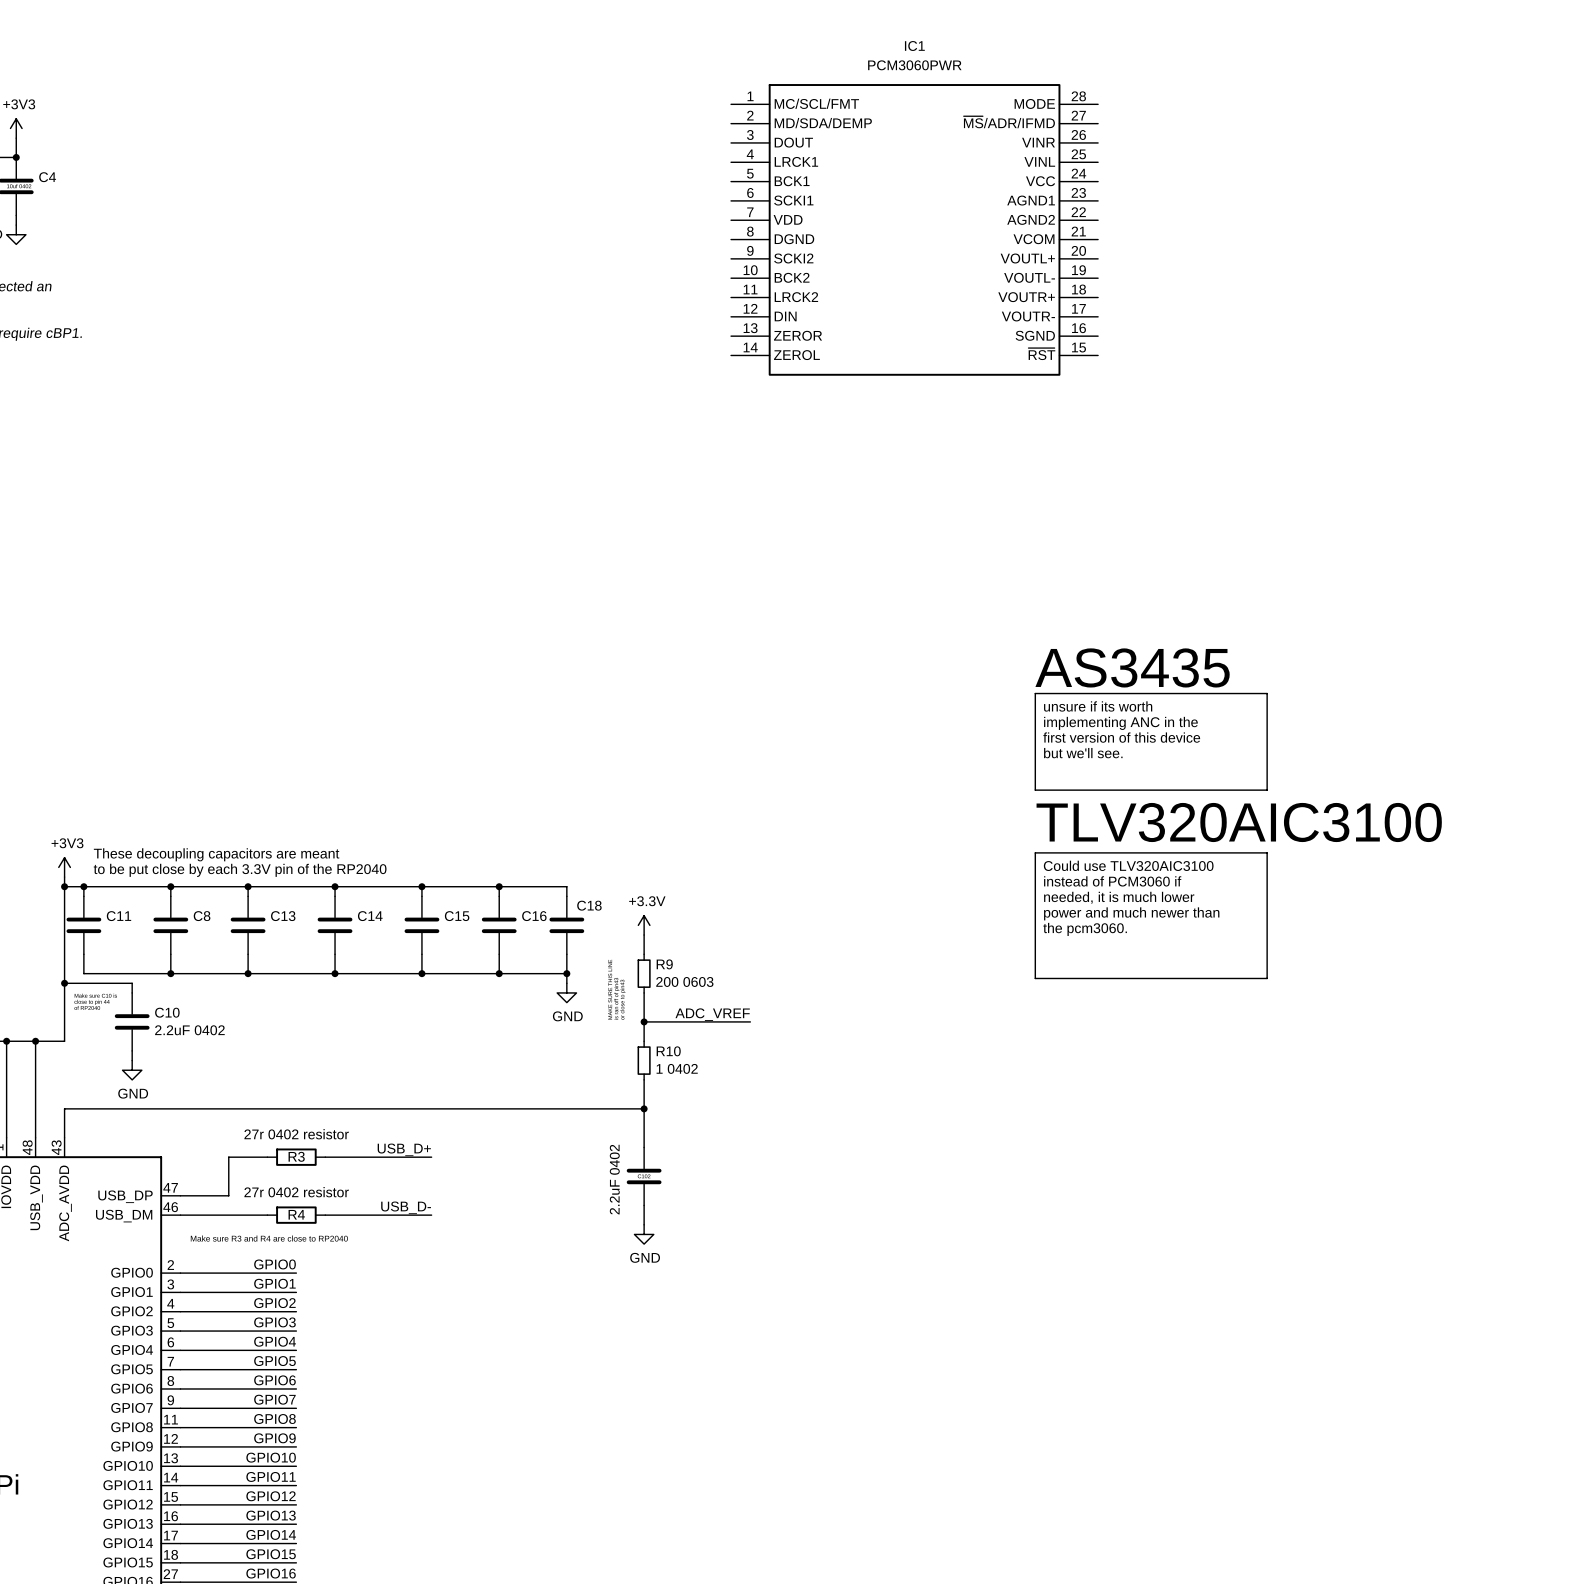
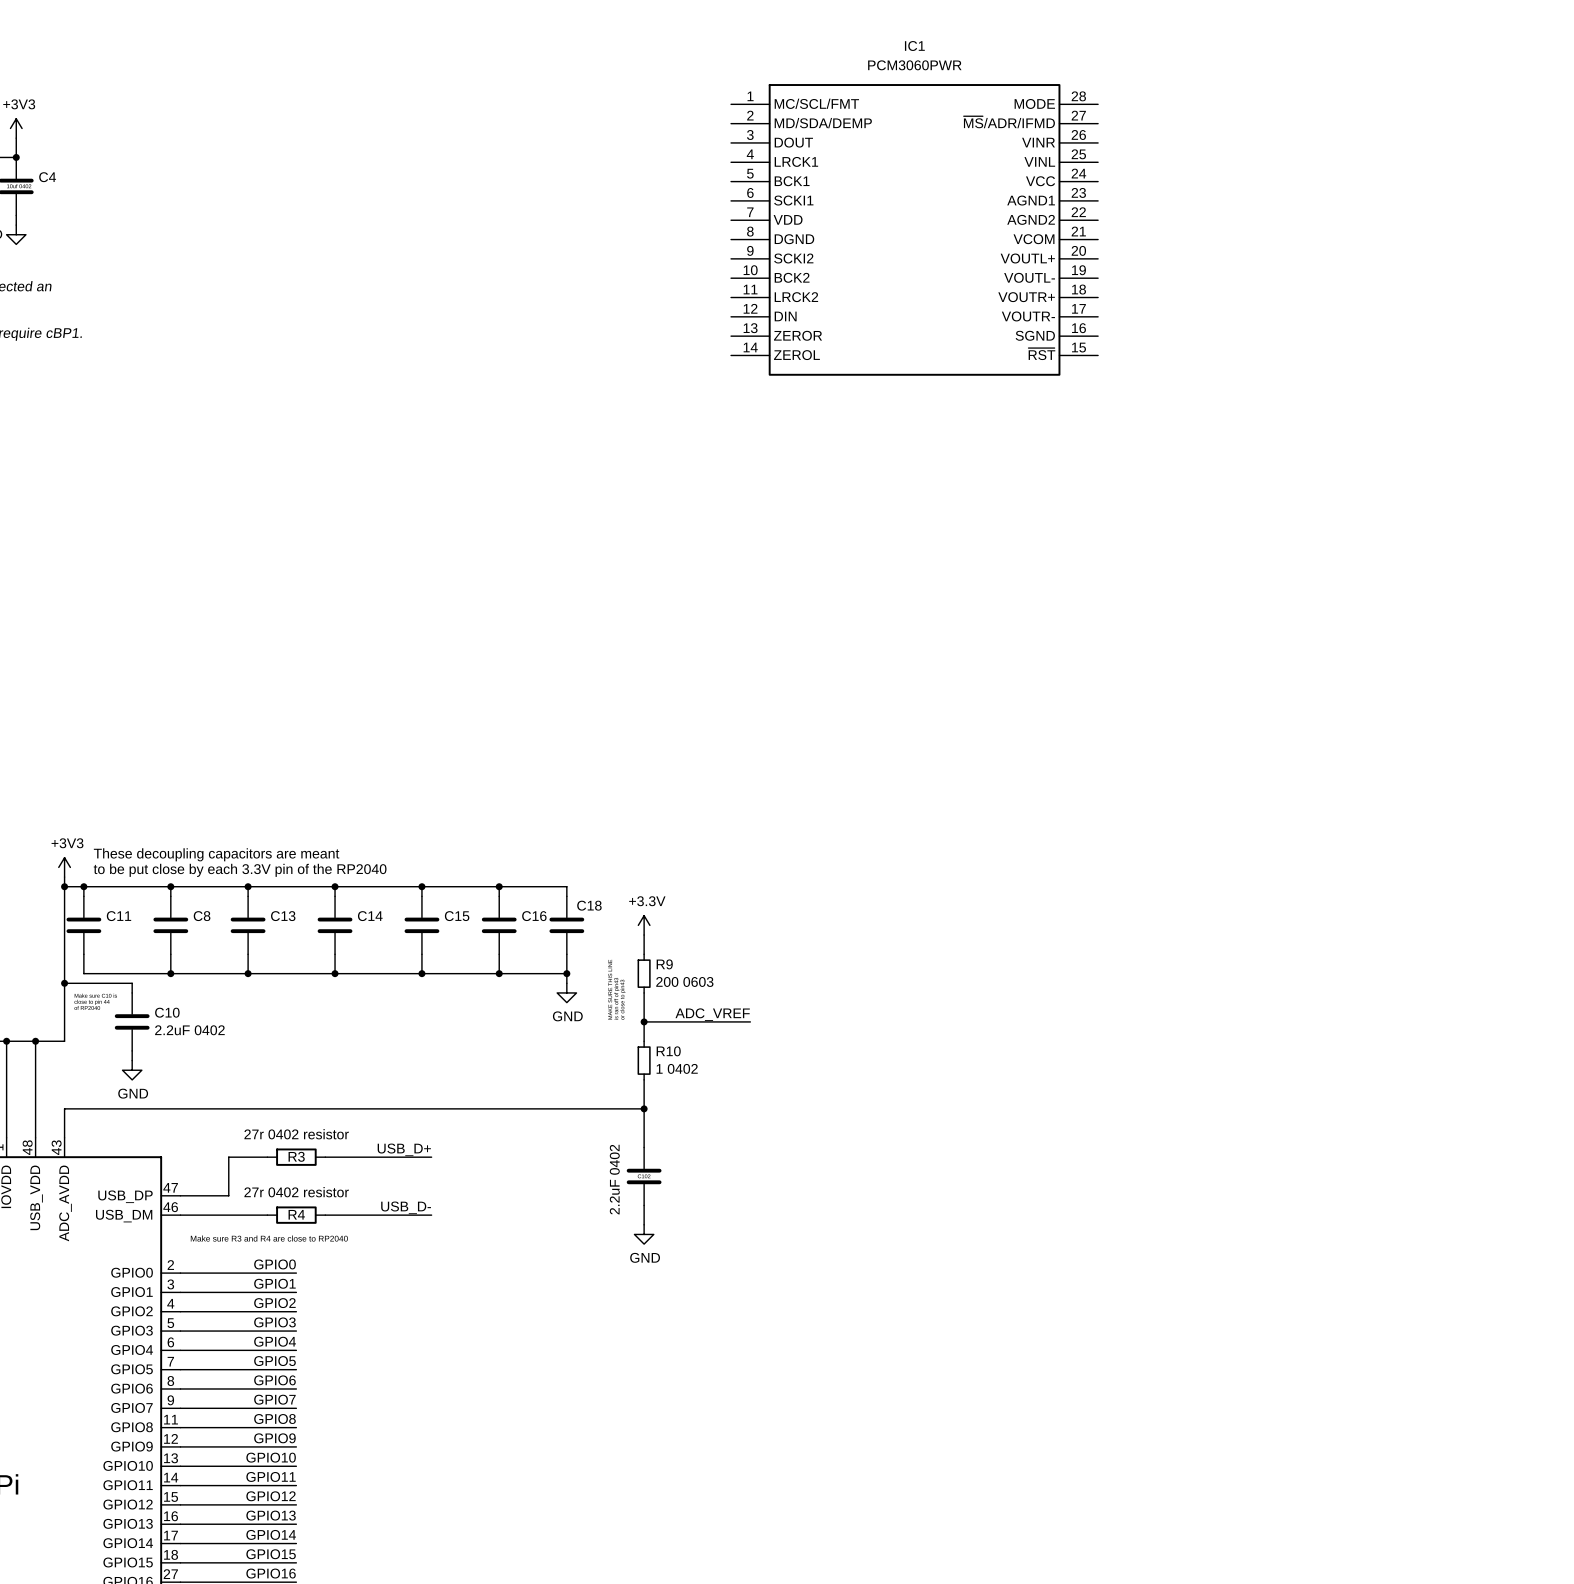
text: AS3435 (1132, 667) -> none
line: (1035, 693) (1035, 790) (1267, 790) (1267, 693) (1035, 693) -> none
text: unsure if its worth (1098, 706) -> none
text: implementing ANC in the (1120, 723) -> none
text: first version of this device (1121, 737) -> none
text: but we'll see. (1083, 753) -> none
text: TLV320AIC3100 (1239, 822) -> none
line: (1035, 852) (1267, 852) (1267, 978) (1035, 978) (1035, 852) -> none
text: Could use TLV320AIC3100 (1128, 865) -> none
text: instead of PCM3060 if (1112, 881) -> none
text: needed, it is much lower (1119, 897) -> none
text: power and much newer than (1131, 913) -> none
text: the pcm3060. (1085, 929) -> none

